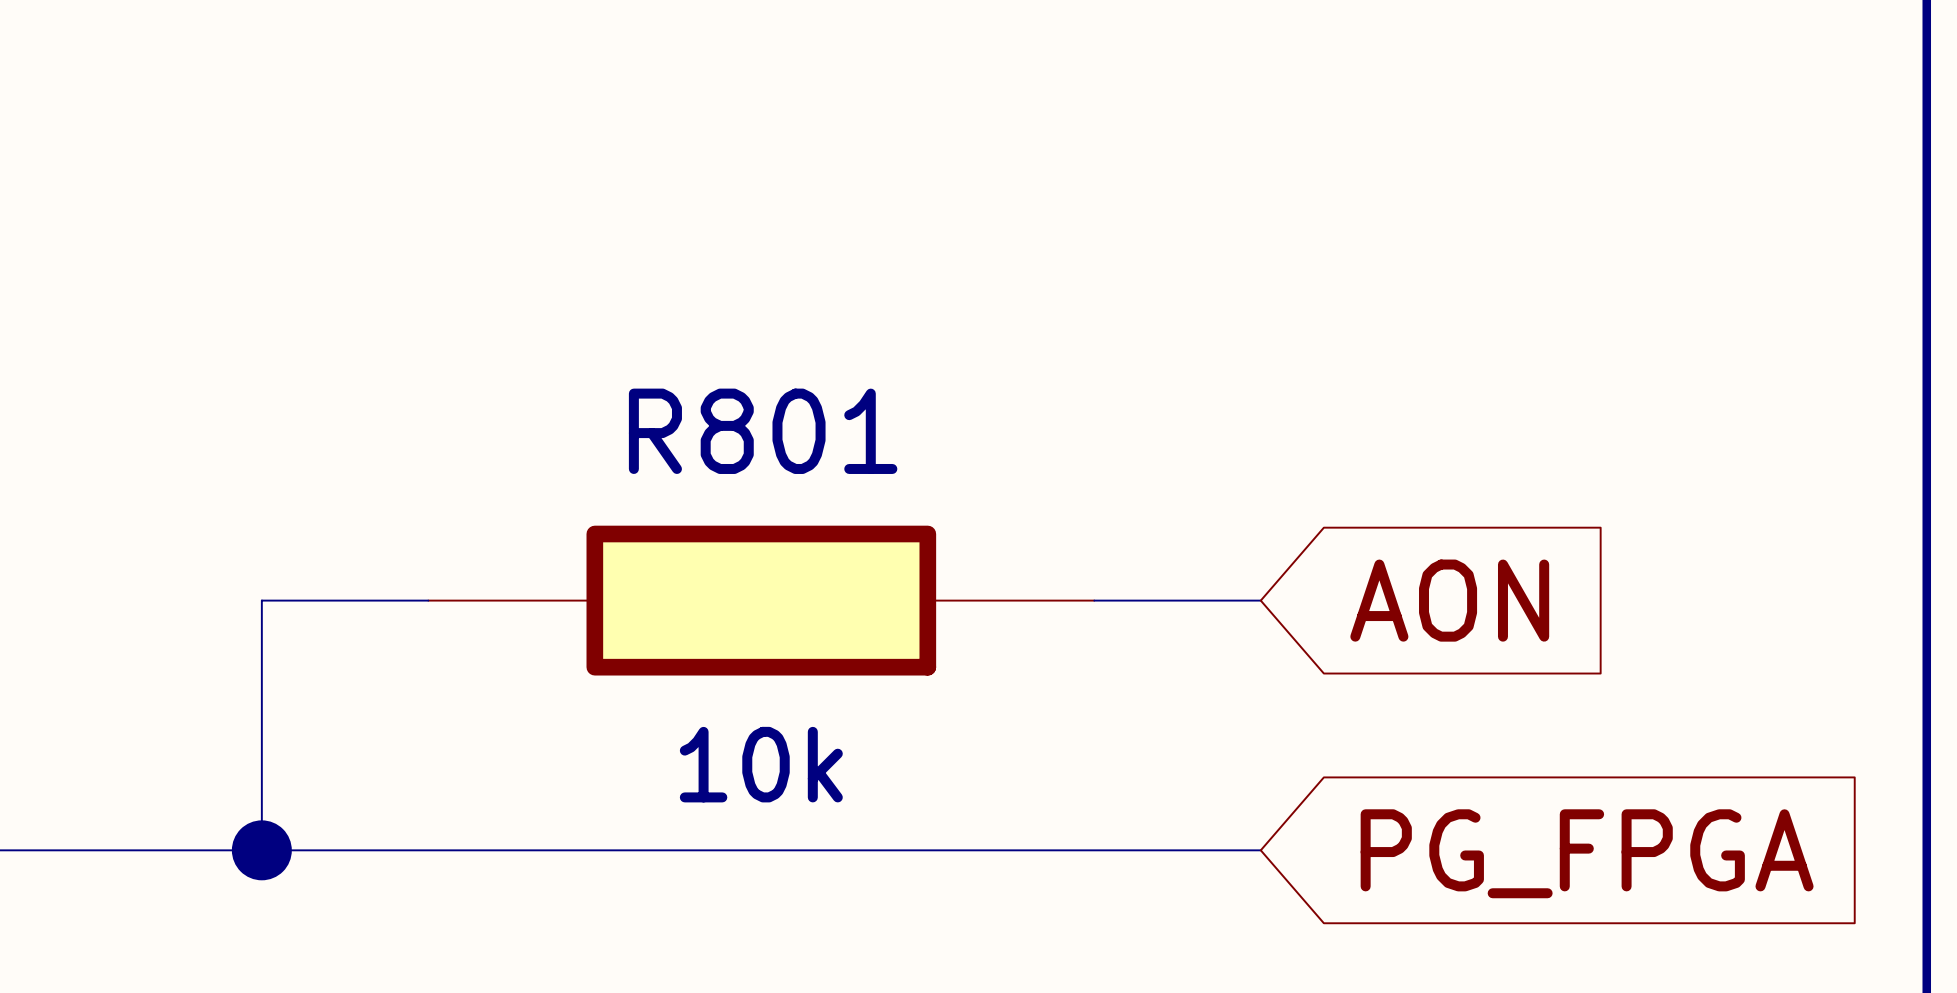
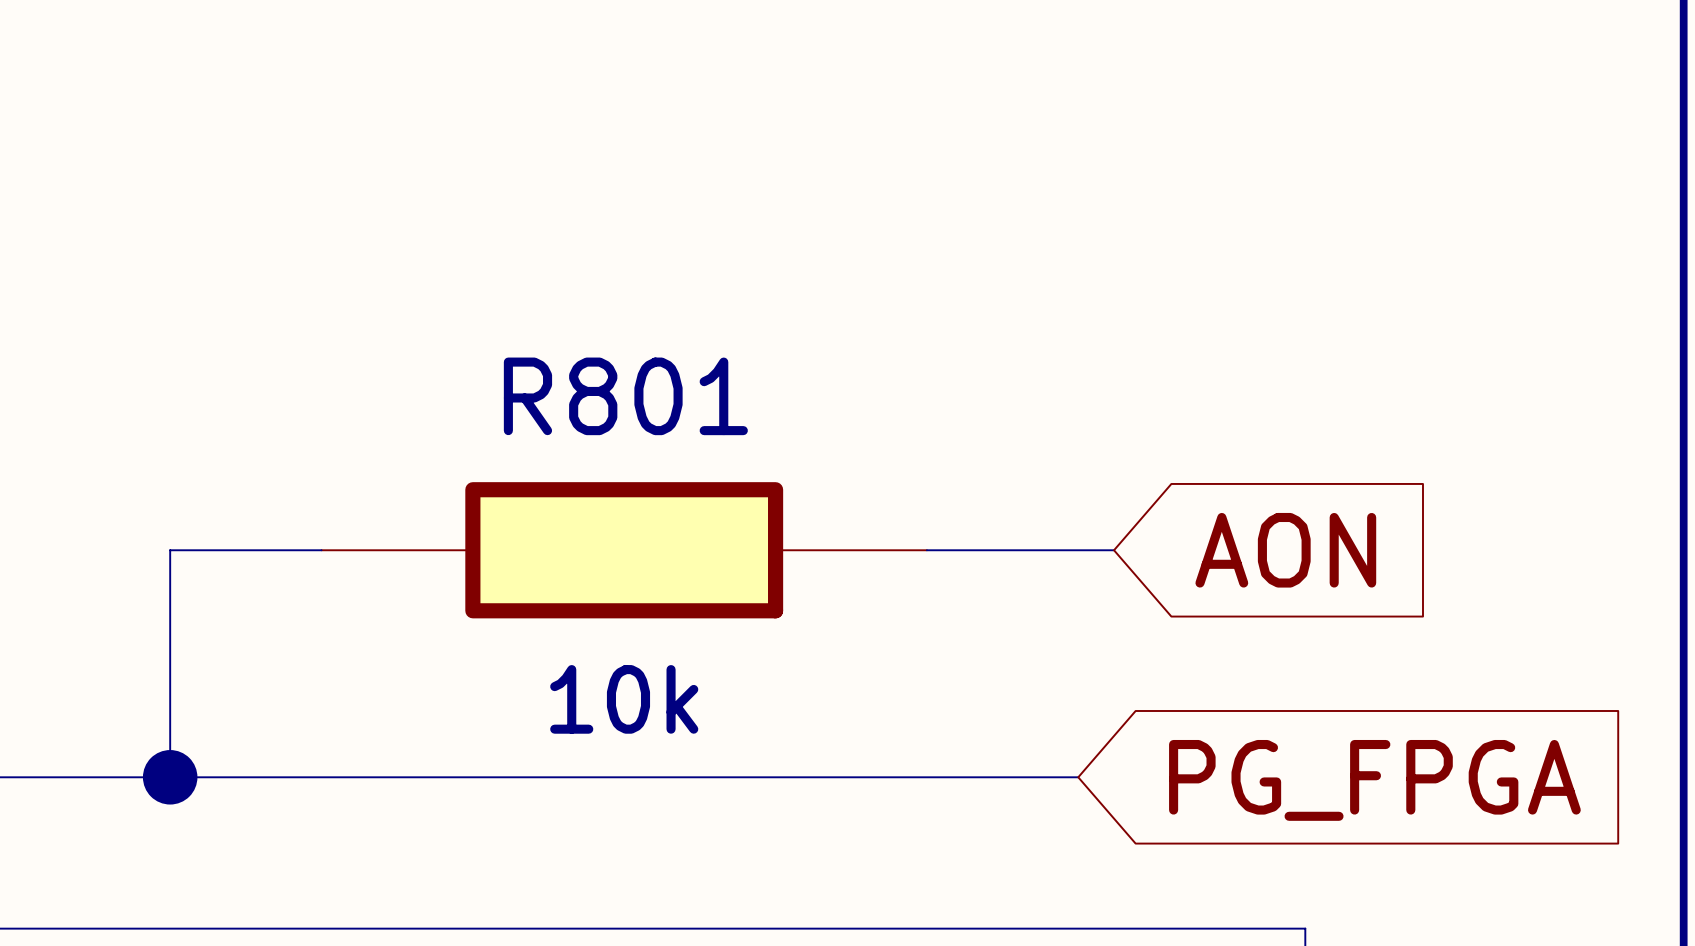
wire: none -> (1078, 550) (1114, 550)
global label position: AON (1449, 600) -> AON (1285, 550)

